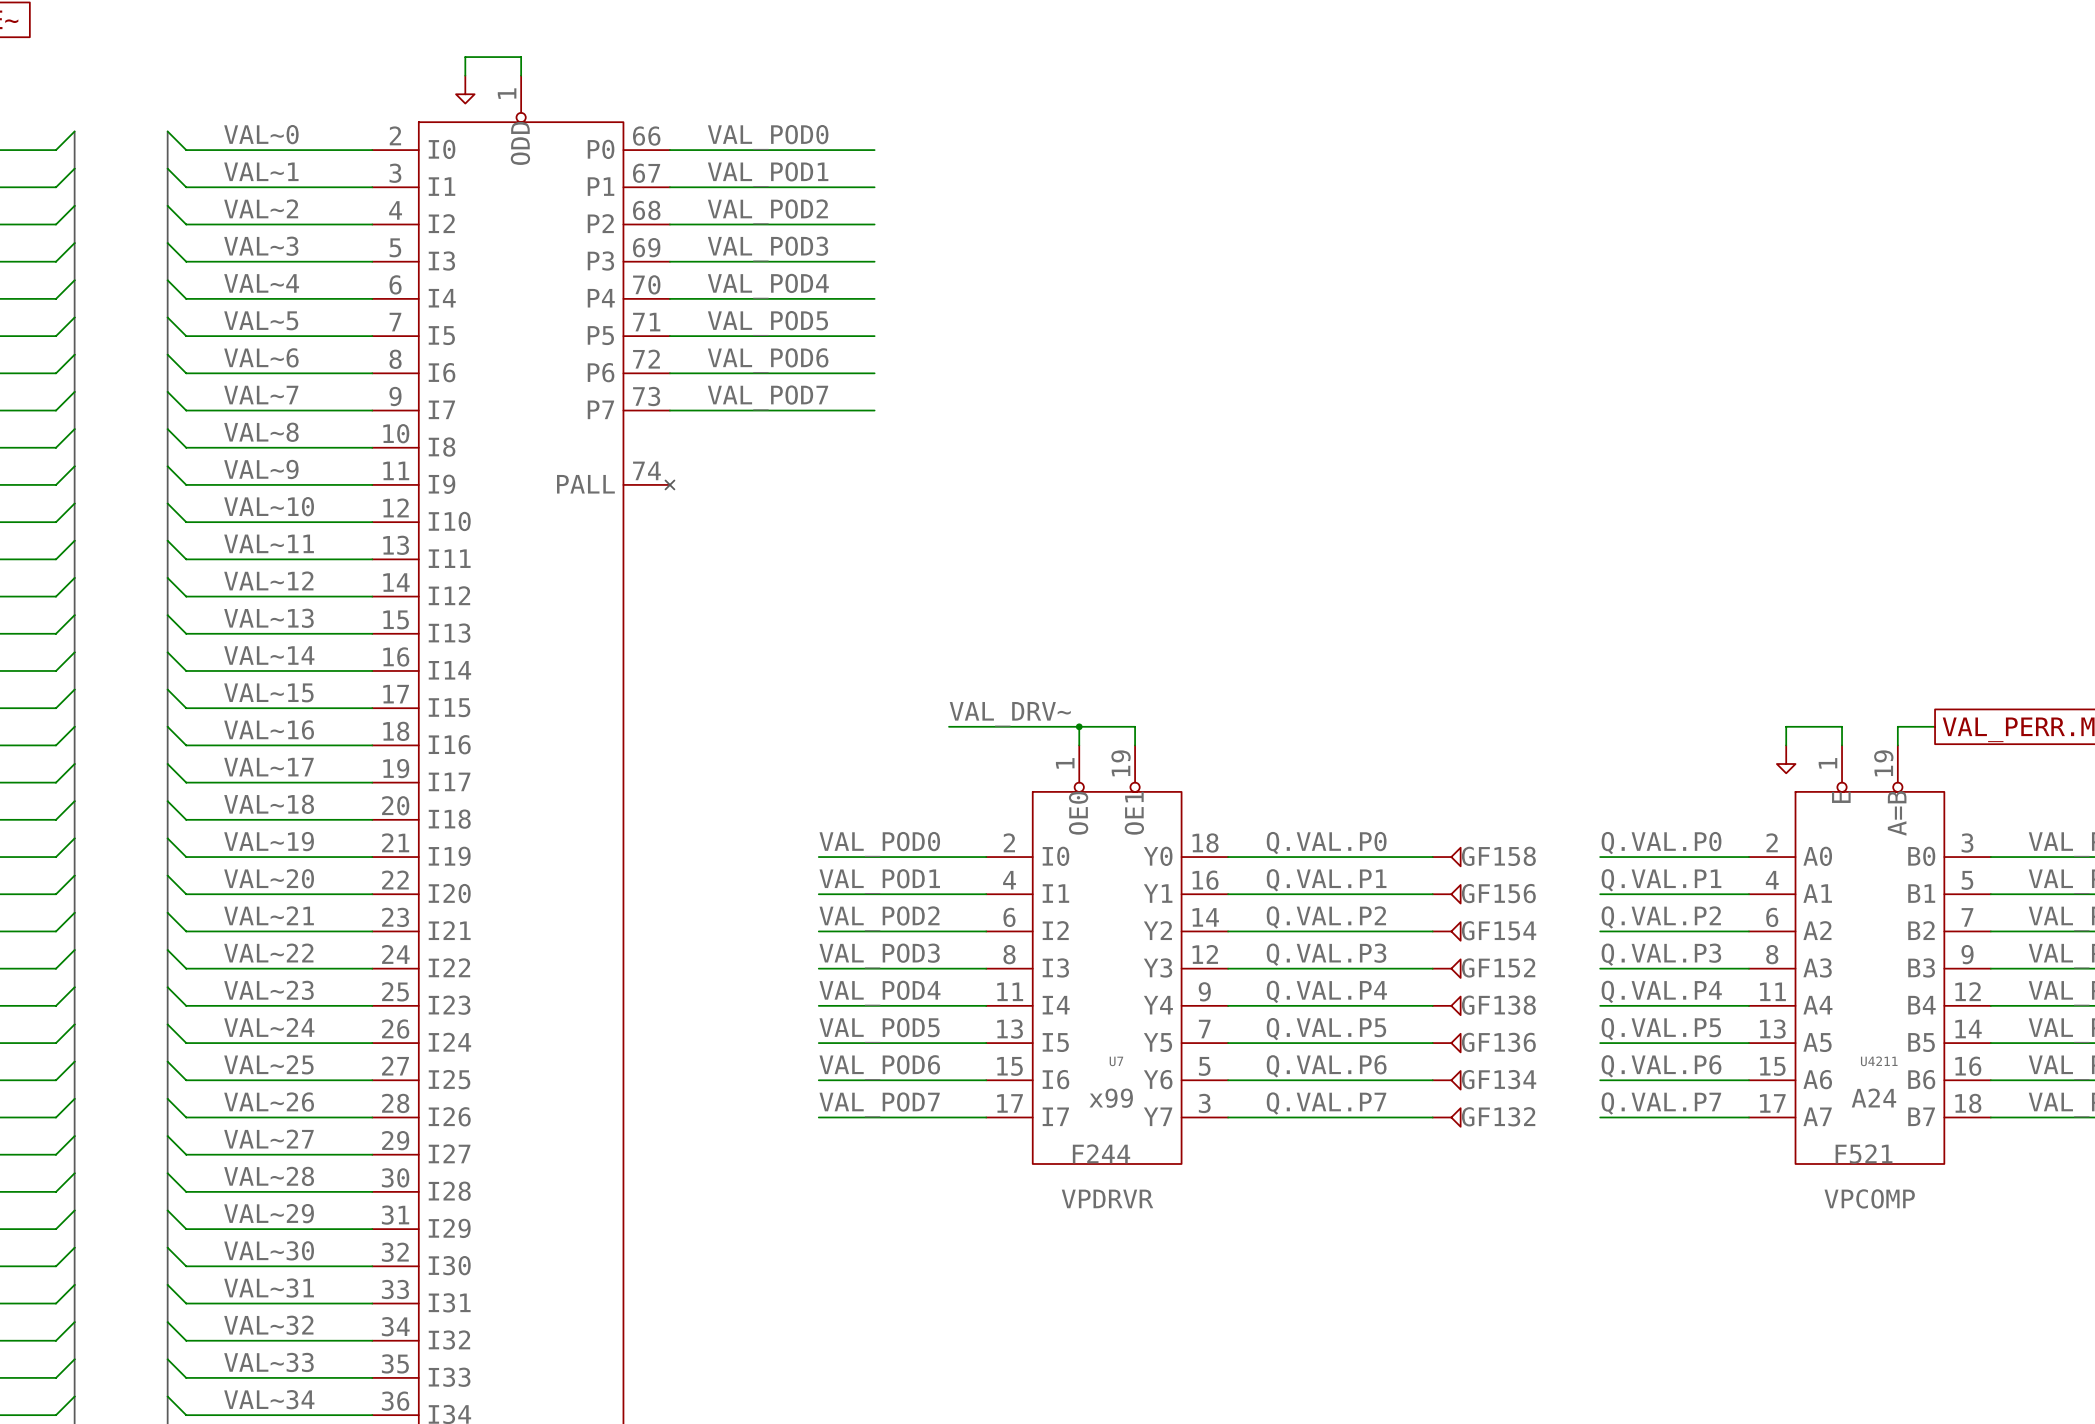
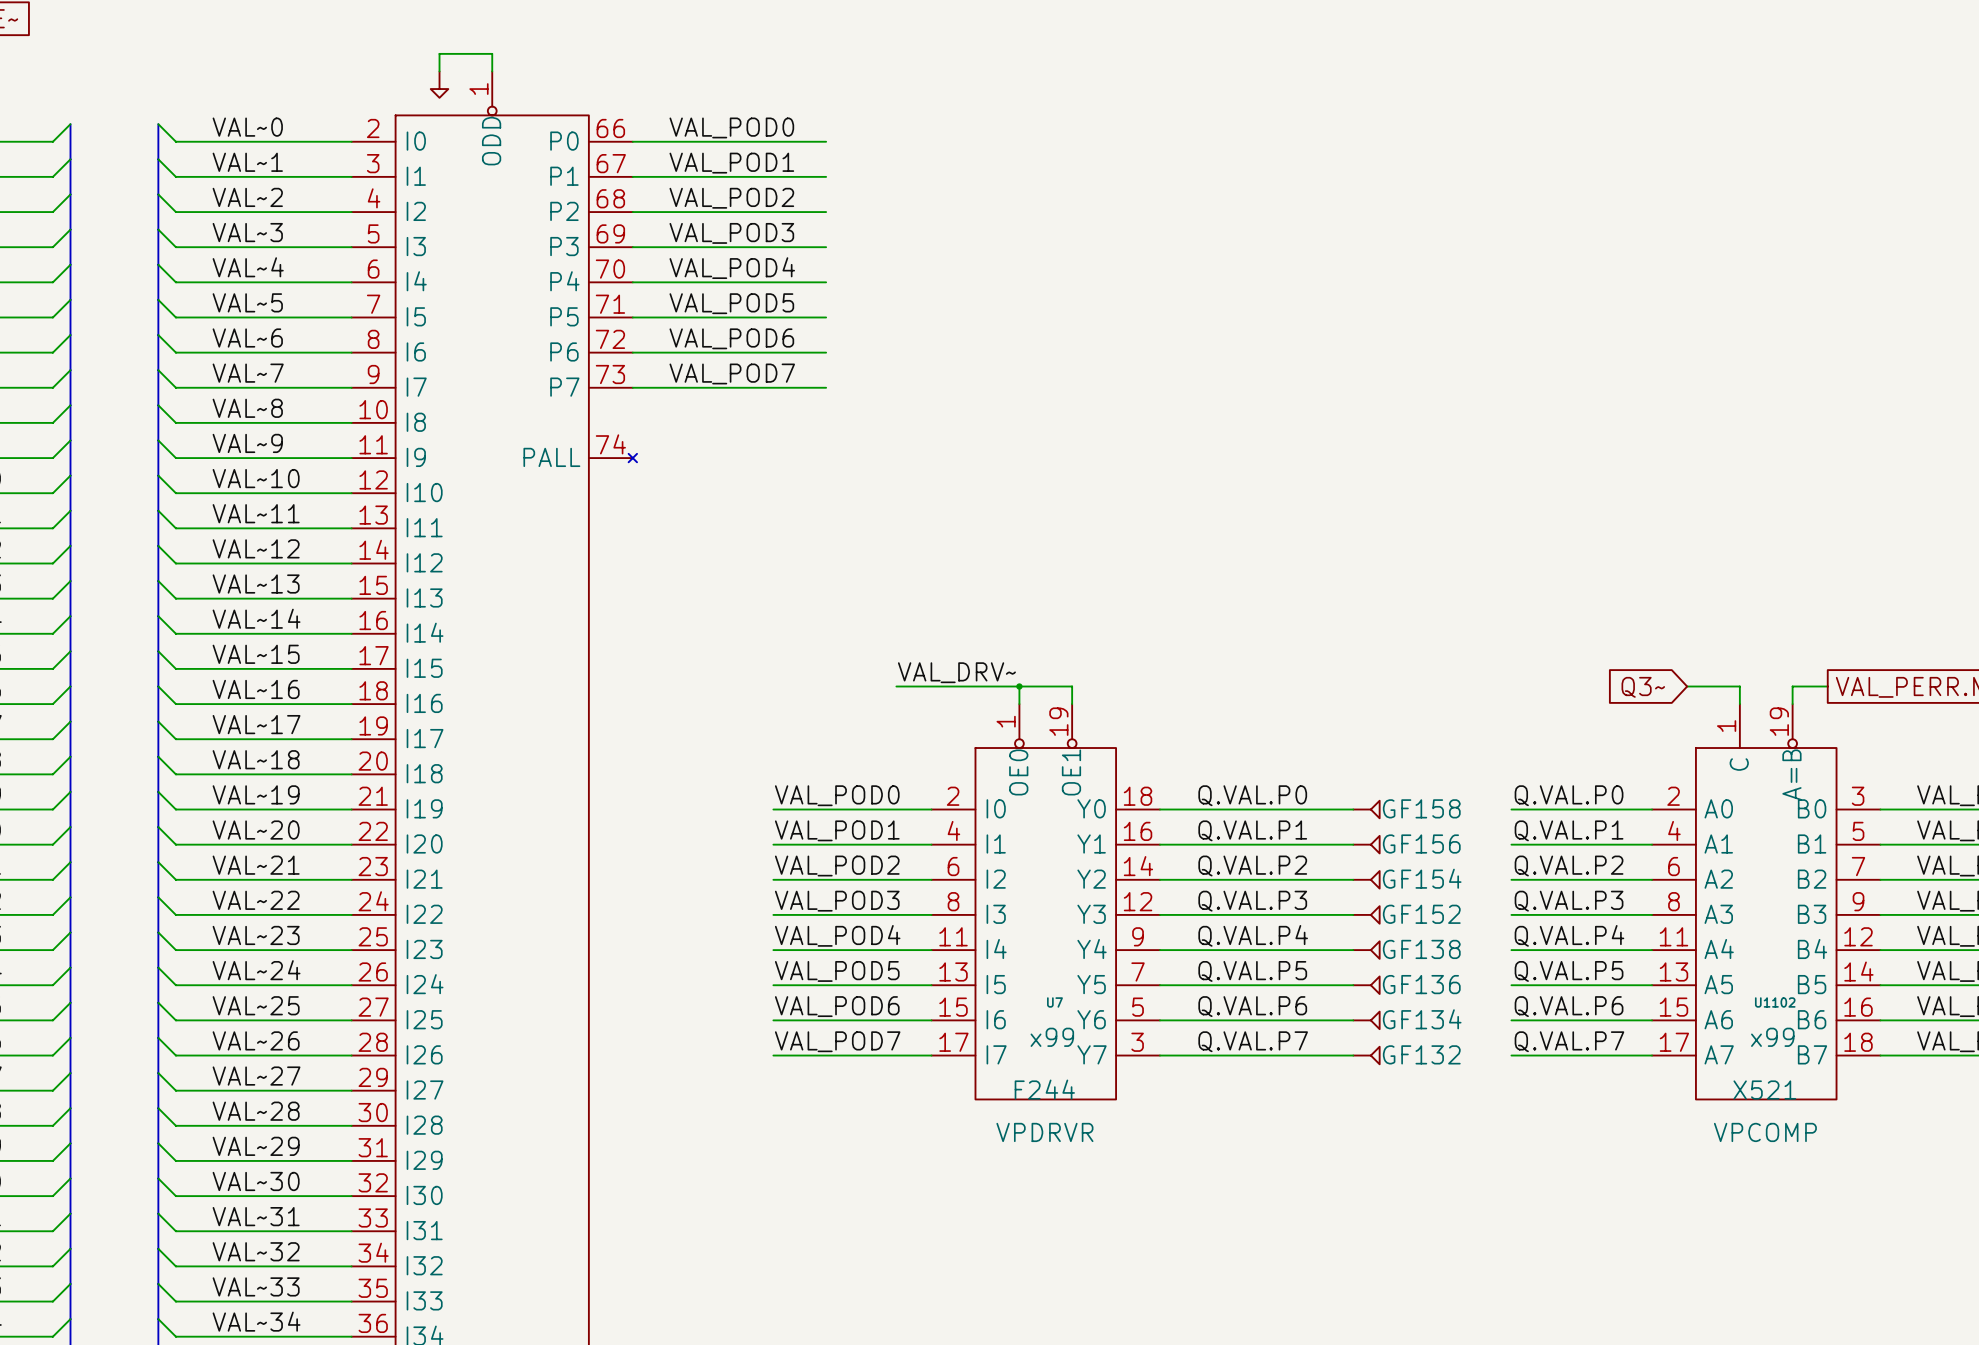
wire: (1786, 726) (1786, 745) -> none
global label: none -> Q3~ (1643, 687)
power symbol: (1786, 759) -> none
U4211: F521 (1869, 954) -> none
U1102: none -> X521 (1766, 901)

